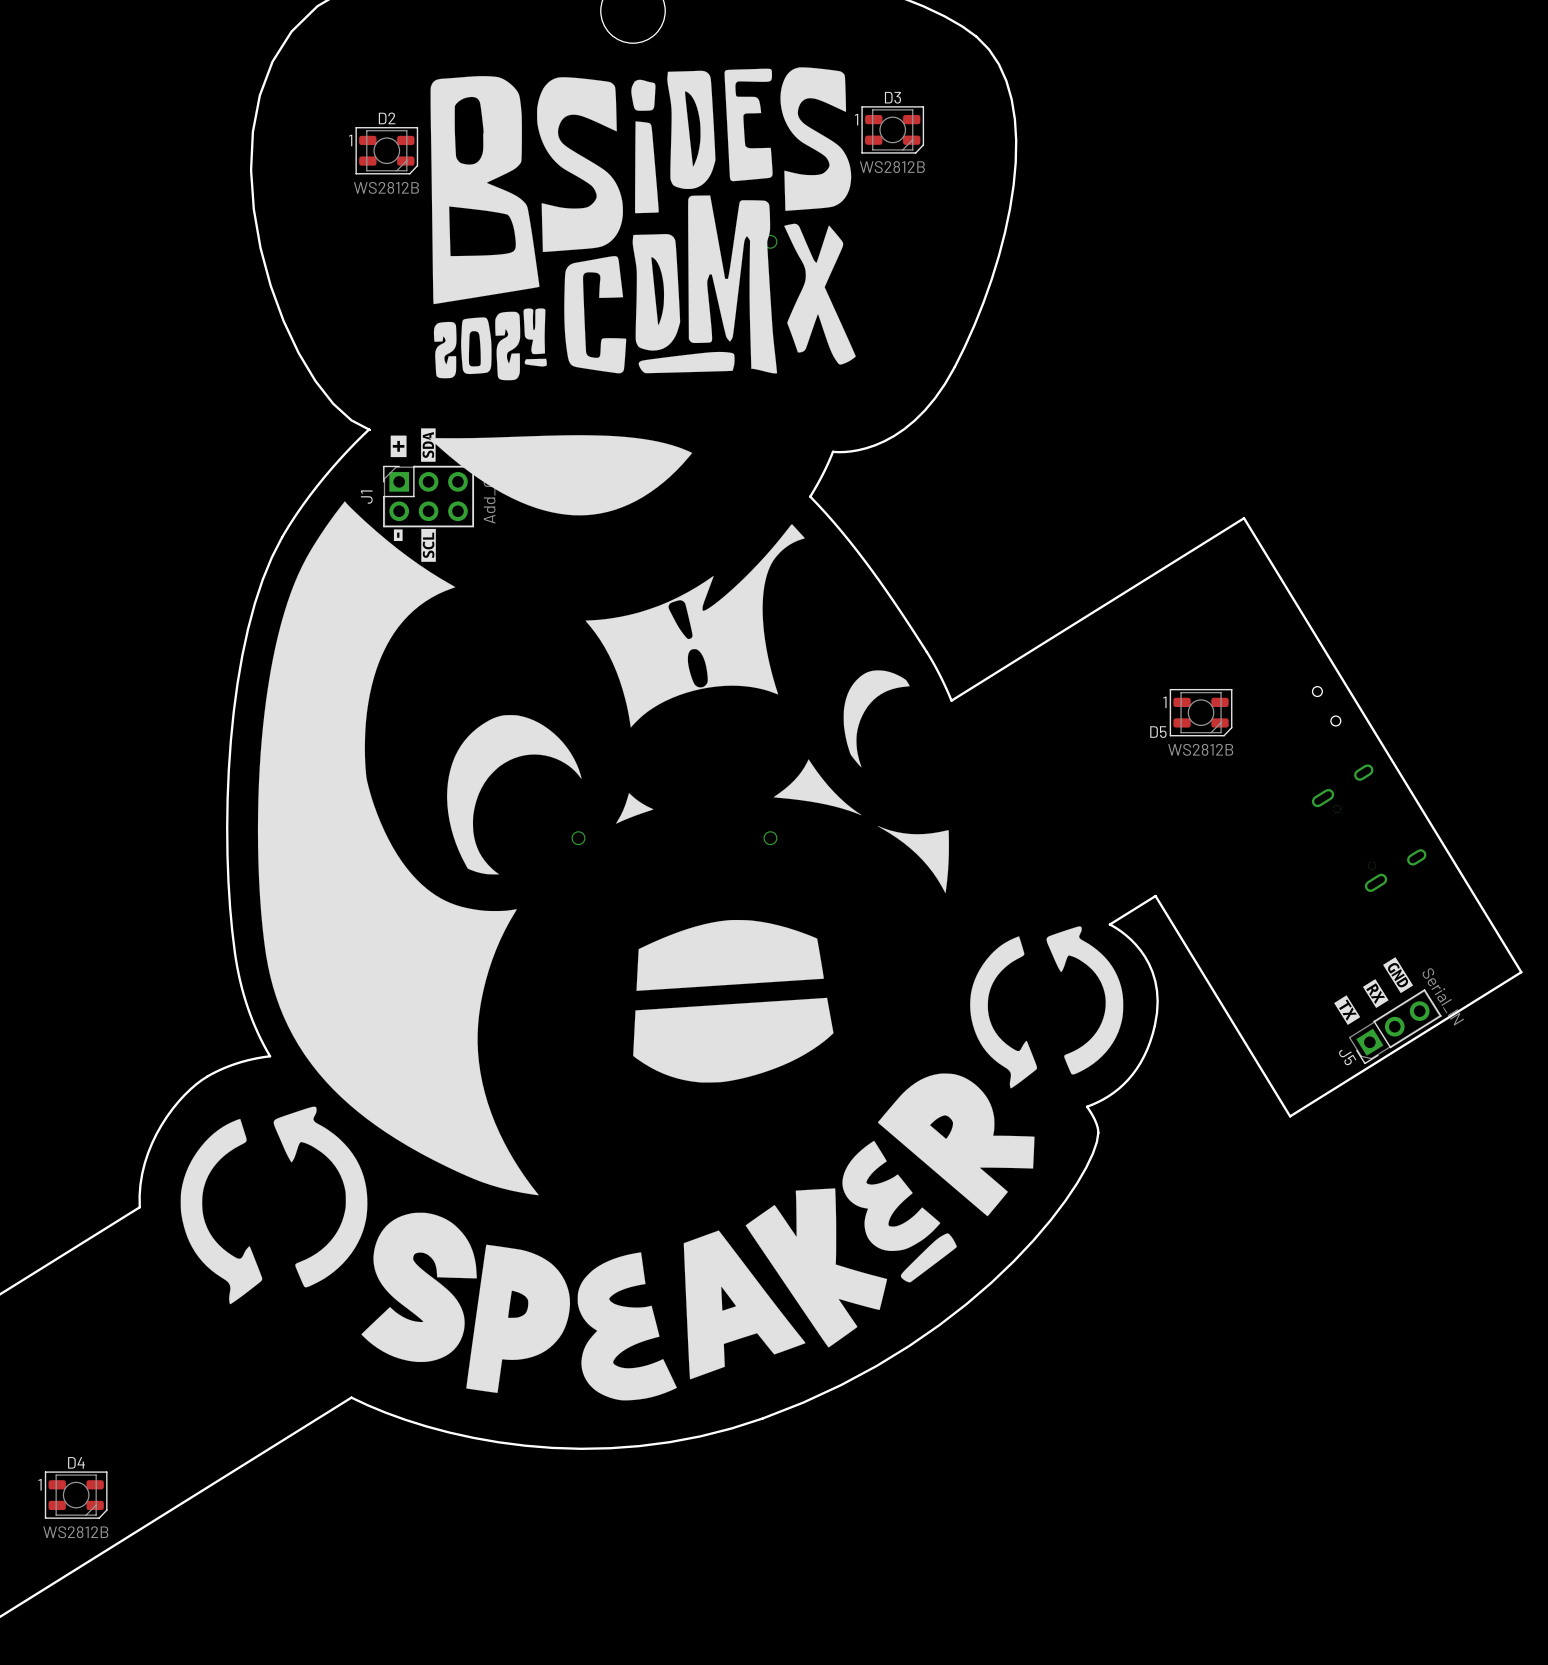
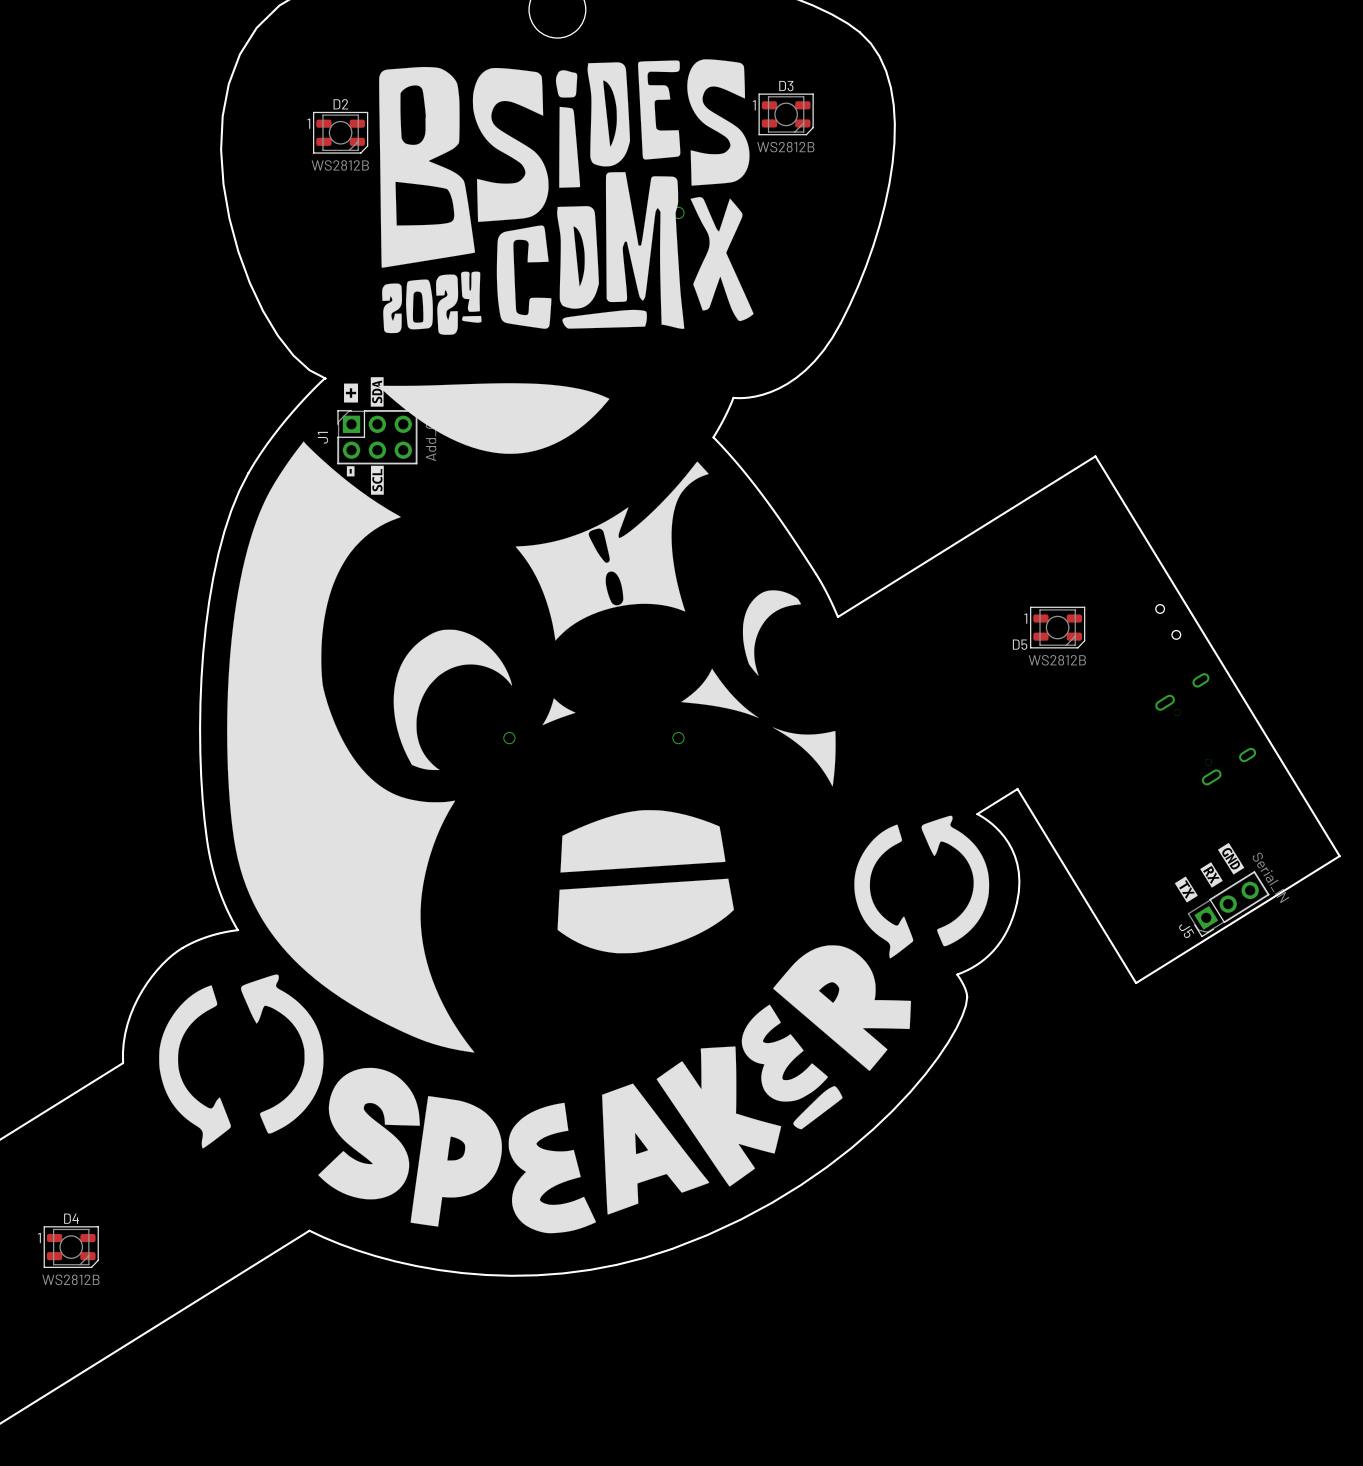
D4 position: (76, 1495) -> (71, 1247)

